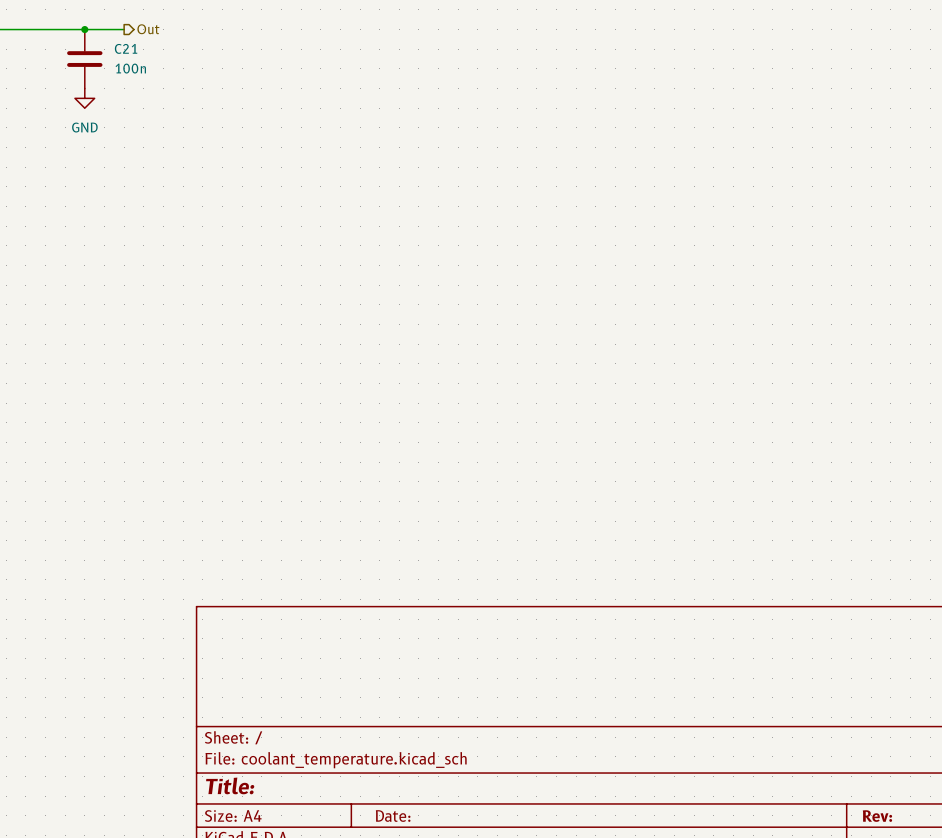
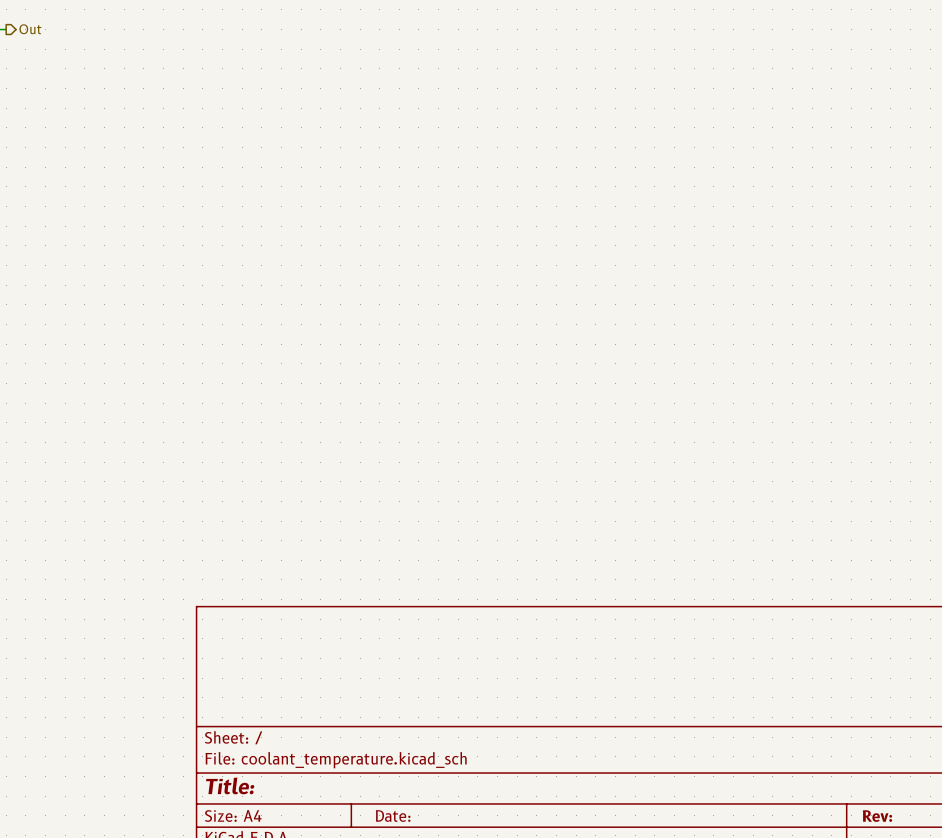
wire: (6, 29) (124, 29) -> none
junction: (84, 29) -> none
hierarchical label position: Out (148, 29) -> Out (30, 29)
C21: 100n (84, 59) -> none
power symbol: GND (84, 98) -> none

